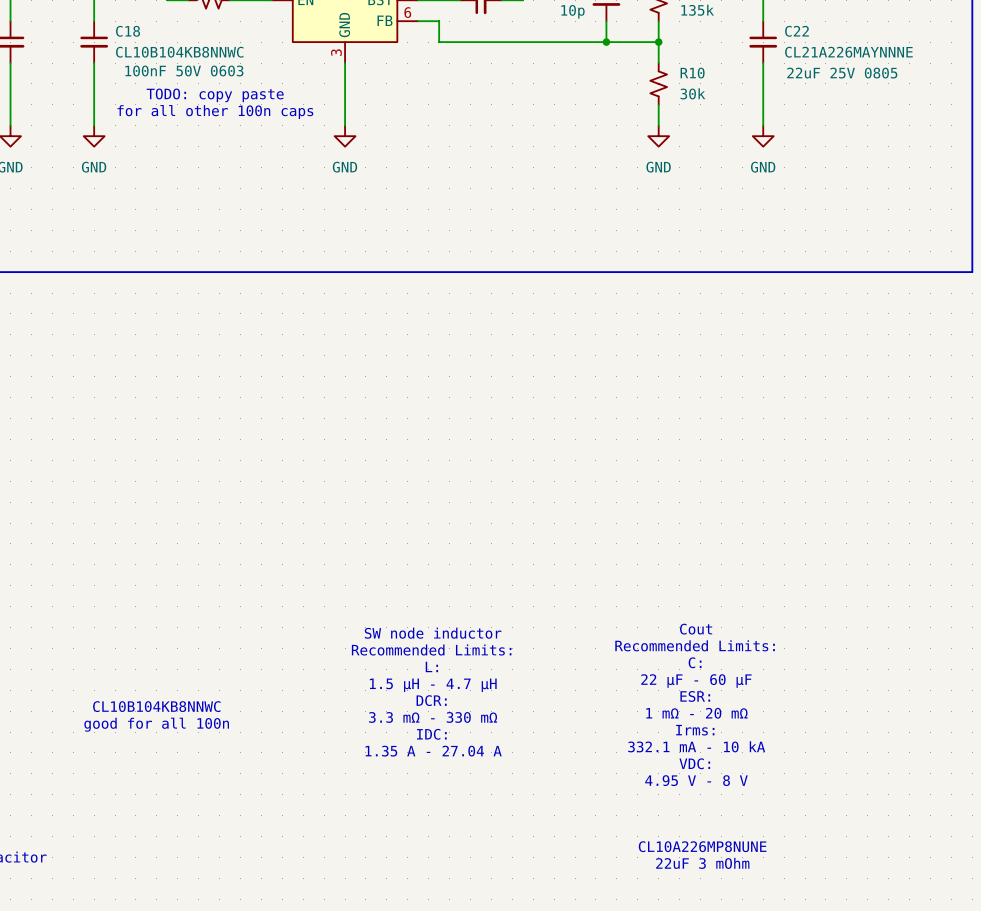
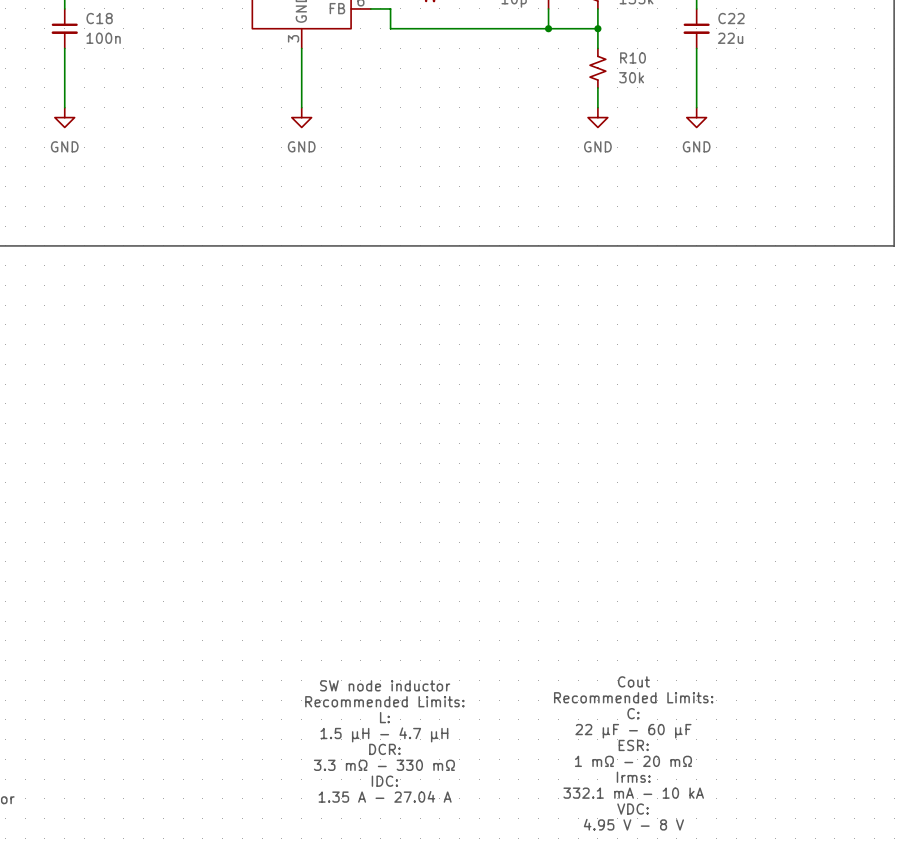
C18 value: CL10B104KB8NNWC (179, 52) -> 100n (103, 38)
C22 value: CL21A226MAYNNNE (848, 52) -> 22u (730, 38)
C18 text: 100nF 50V 0603 (184, 70) -> none
C22 text: 22uF 25V 0805 (842, 73) -> none
text: TODO: copy paste (215, 95) -> none
text: for all other 100n caps (215, 112) -> none
text position: Cout (696, 629) -> Cout (633, 681)
text position: SW node inductor (433, 633) -> SW node inductor (385, 685)
text position: Recommended Limits: (695, 645) -> Recommended Limits: (633, 697)
text position: Recommended Limits: (431, 650) -> Recommended Limits: (384, 701)
text position: C: (695, 662) -> C: (633, 713)
text position: L: (431, 666) -> L: (384, 717)
text position: 22 μF - 60 μF (696, 681) -> 22 μF - 60 μF (633, 731)
text position: 1.5 μH - 4.7 μH (433, 685) -> 1.5 μH - 4.7 μH (384, 734)
text position: ESR: (695, 696) -> ESR: (633, 745)
text position: DCR: (431, 700) -> DCR: (384, 749)
text: CL10B104KB8NNWC (156, 706) -> none
text position: 1 mΩ - 20 mΩ (696, 713) -> 1 mΩ - 20 mΩ (633, 761)
text position: 3.3 mΩ - 330 mΩ (433, 717) -> 3.3 mΩ - 330 mΩ (384, 765)
text: good for all 100n (156, 724) -> none
text position: Irms: (695, 730) -> Irms: (633, 777)
text position: IDC: (431, 734) -> IDC: (384, 781)
text position: 332.1 mA - 10 kA (696, 746) -> 332.1 mA - 10 kA (633, 793)
text position: 1.35 A - 27.04 A (433, 751) -> 1.35 A - 27.04 A (385, 796)
text position: VDC: (694, 763) -> VDC: (632, 809)
text position: 4.95 V - 8 V (696, 780) -> 4.95 V - 8 V (633, 824)
text: CL10A226MP8NUNE (702, 846) -> none
text: 22uF 3 mOhm (702, 863) -> none

